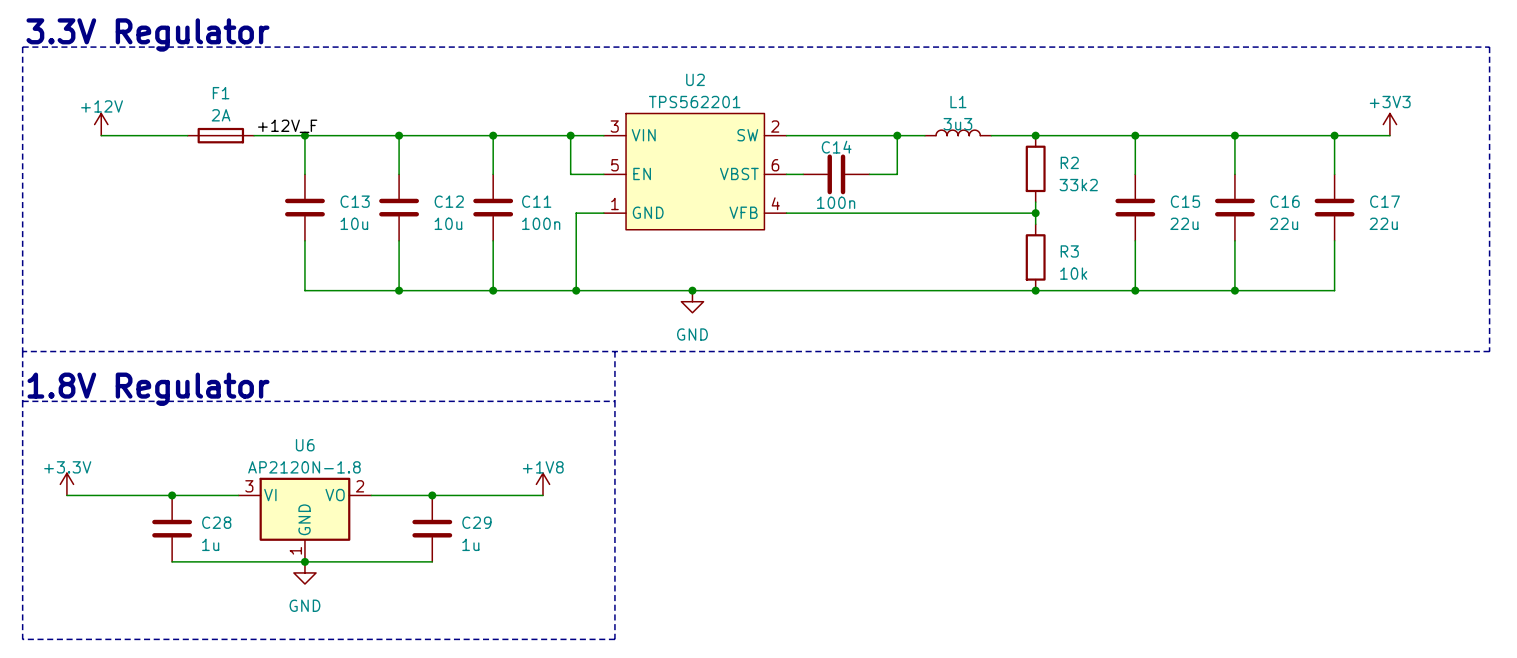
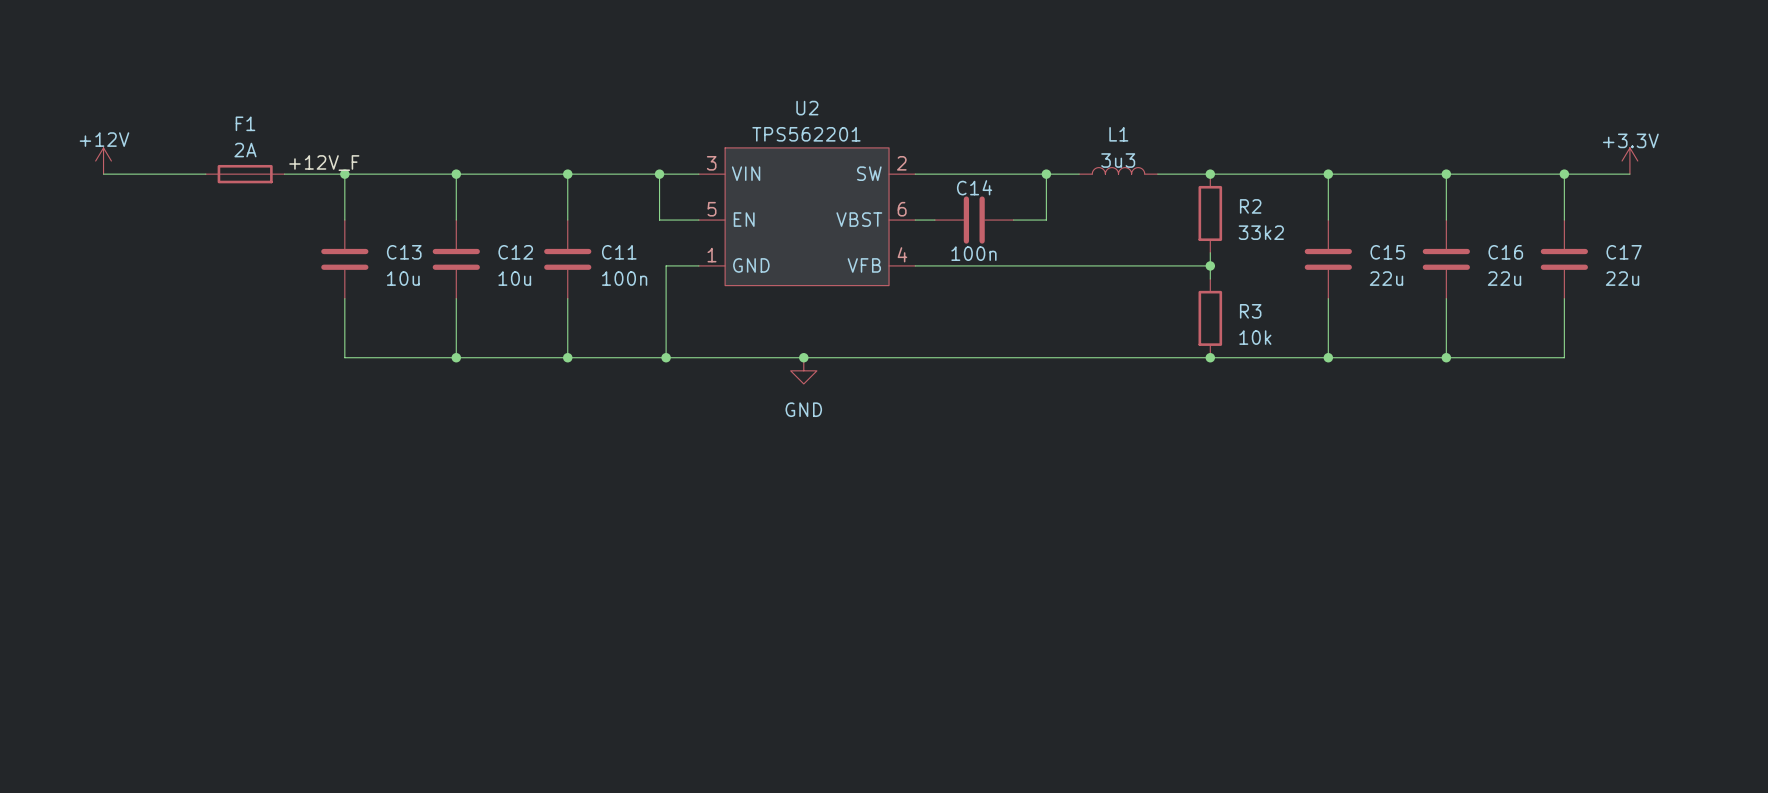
text: 3.3V Regulator (147, 34) -> none
power symbol: +3V3 (1389, 124) -> +3.3V (1629, 161)
line: (22, 351) (22, 639) (614, 639) (614, 351) -> none
line: (22, 351) (22, 47) (1489, 47) (1489, 351) (22, 351) -> none
text: 1.8V Regulator (148, 389) -> none
line: (22, 401) (614, 401) -> none
power symbol: +3.3V (66, 484) -> none
power symbol: +1V8 (543, 484) -> none
wire: (66, 495) (238, 495) -> none
junction: (172, 495) -> none
wire: (371, 495) (543, 495) -> none
junction: (432, 495) -> none
U6: AP2120N-1.8 (304, 519) -> none
C28: 1u (172, 528) -> none
C29: 1u (432, 528) -> none
wire: (172, 561) (432, 561) -> none
junction: (304, 561) -> none
power symbol: GND (304, 572) -> none

